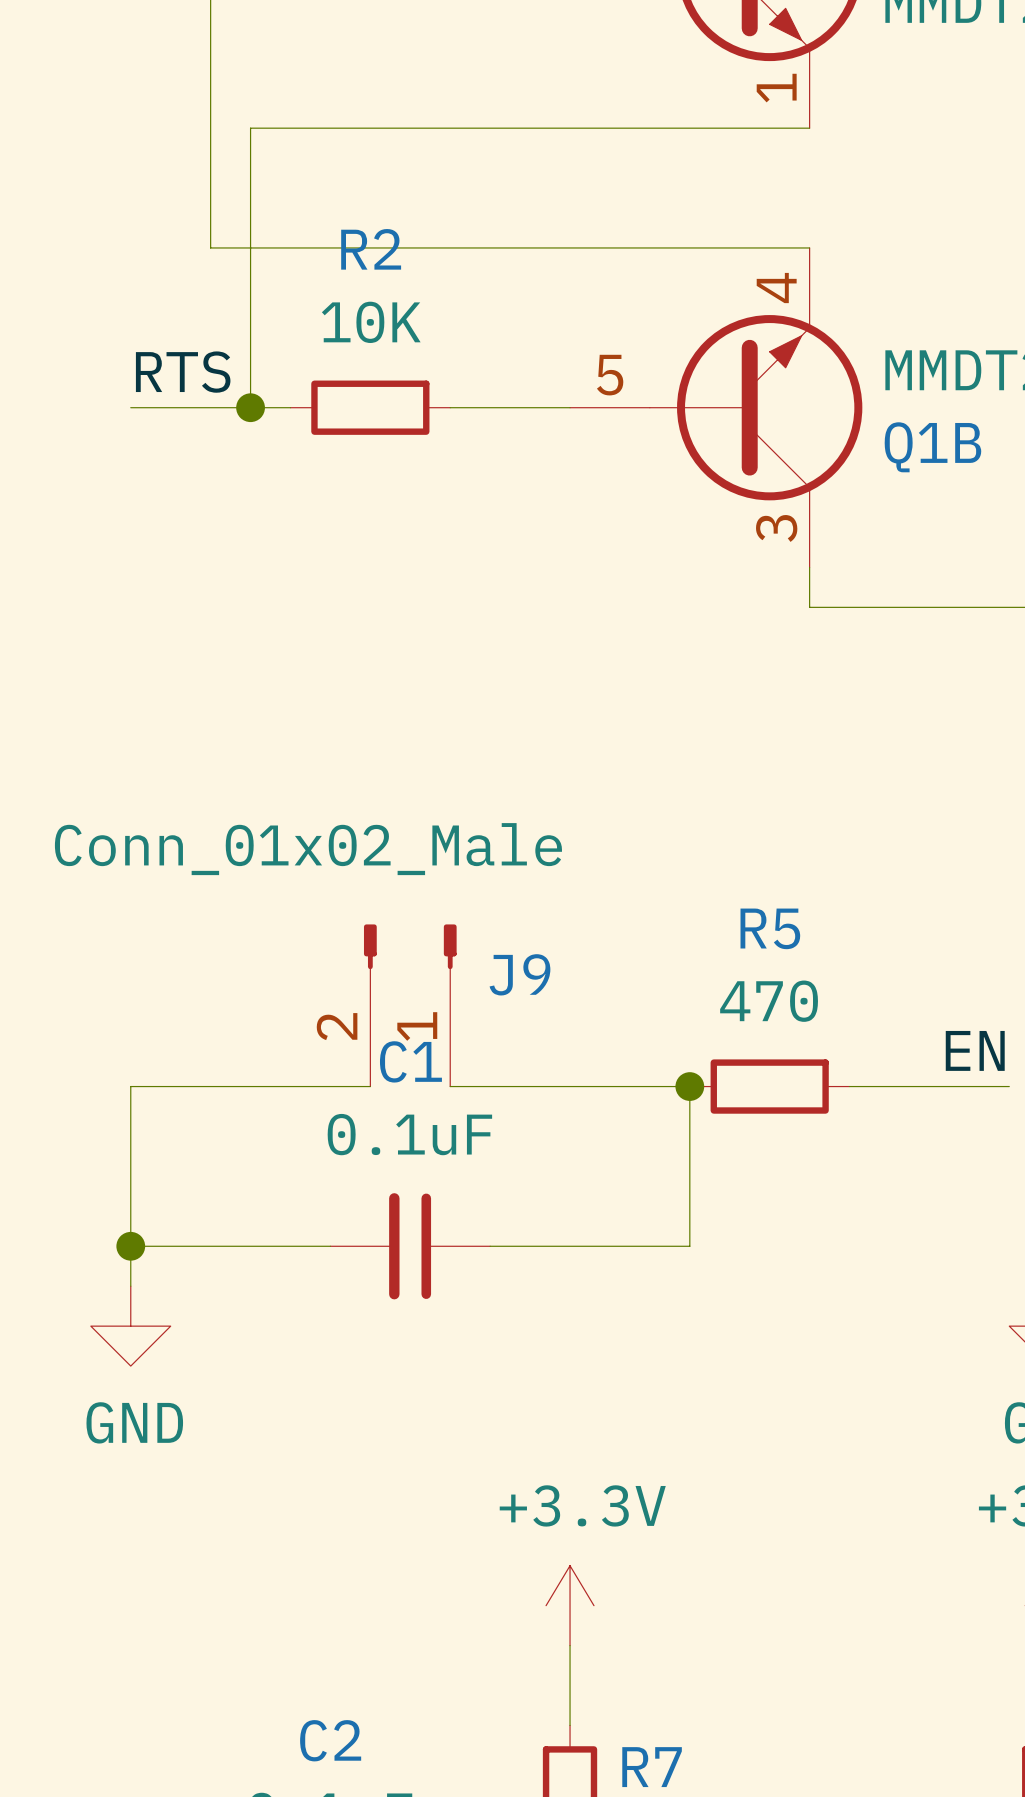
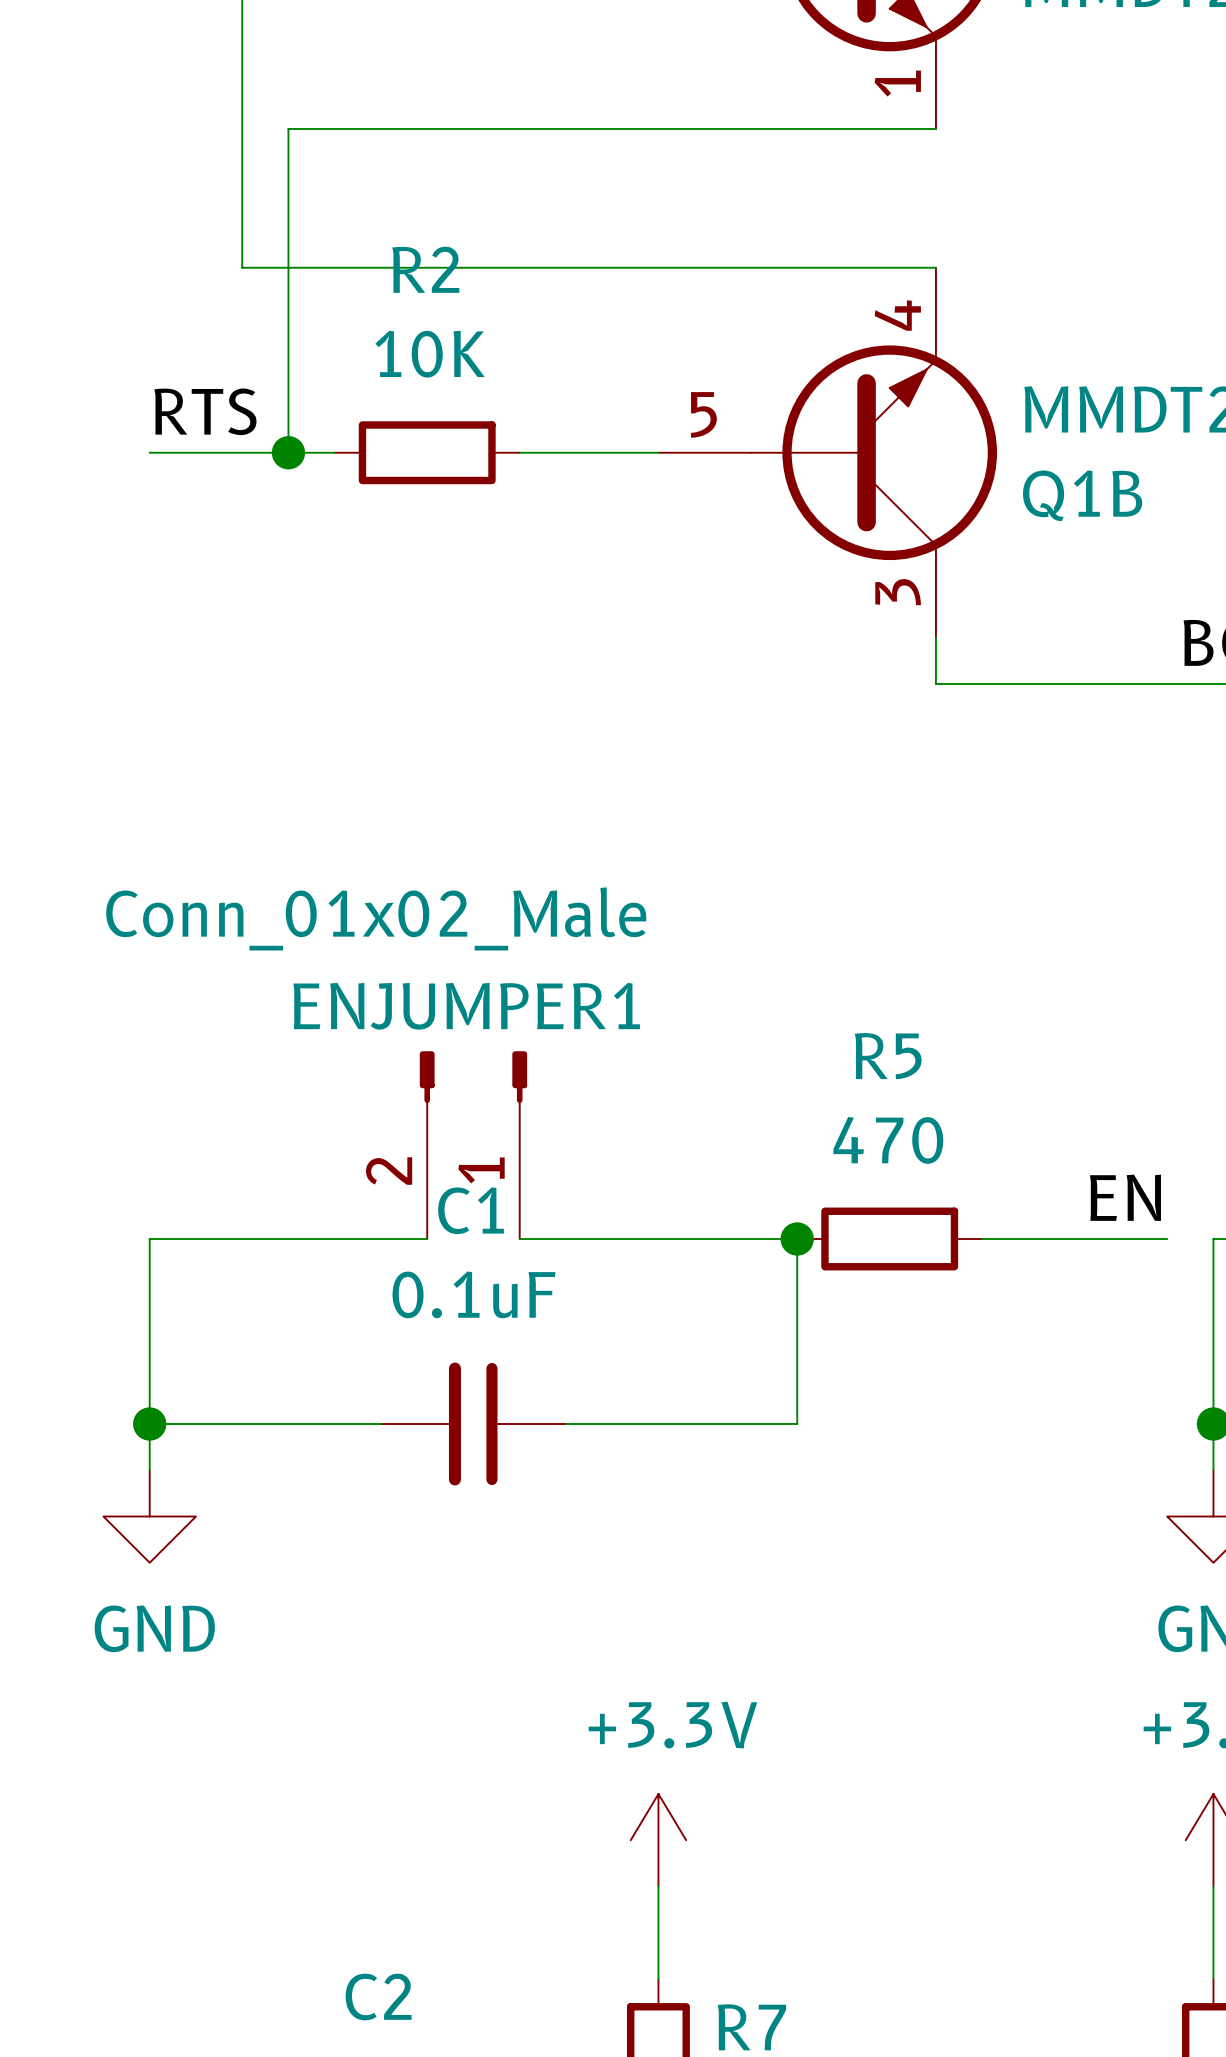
J9 value position: Conn_01x02_Male (308, 849) -> Conn_01x02_Male (376, 918)
J9 name: J9 (519, 974) -> ENJUMPER1 (466, 1006)

